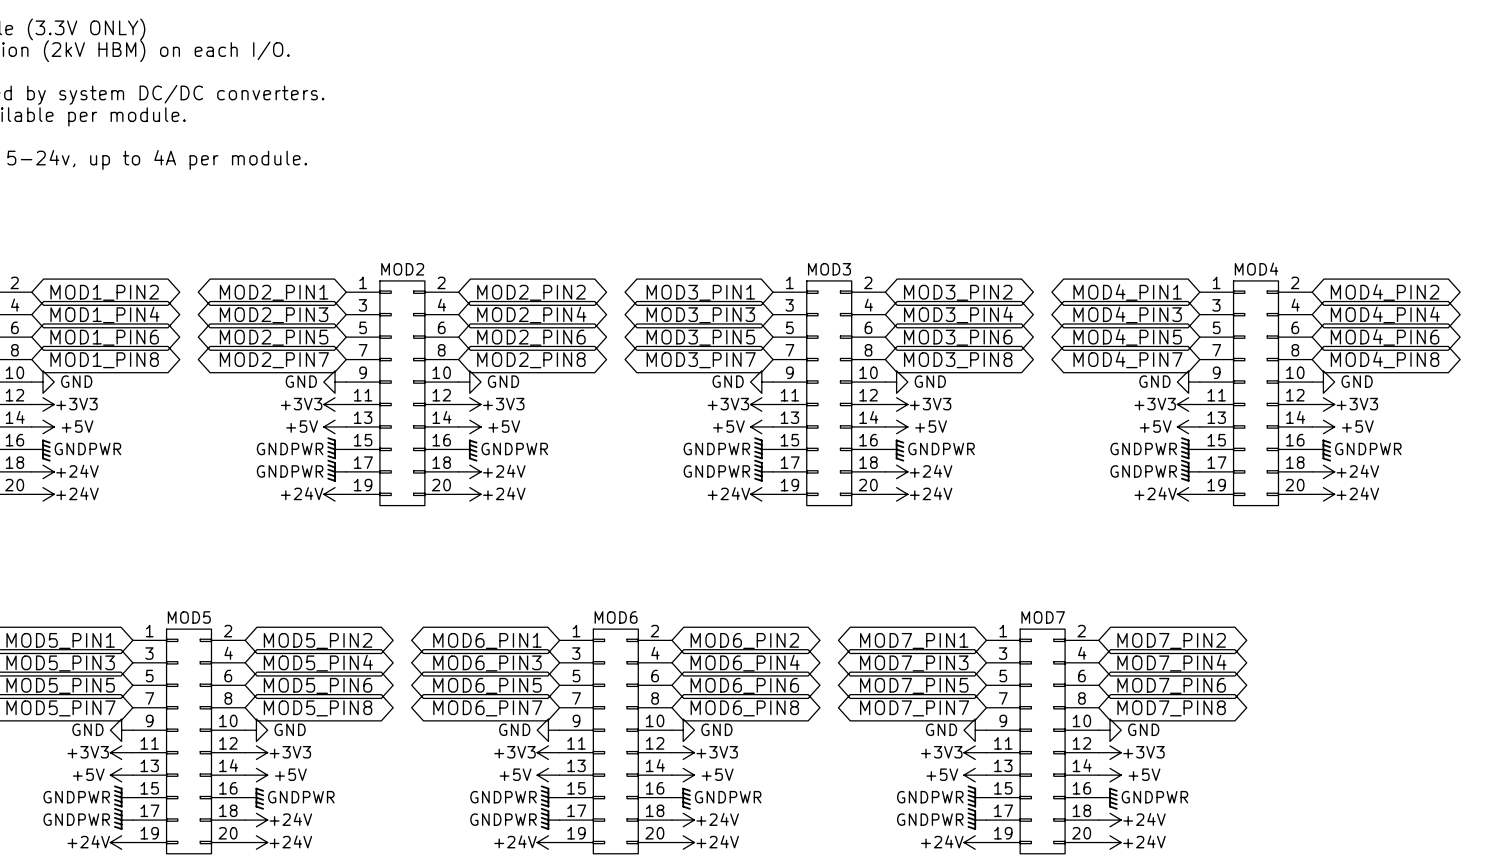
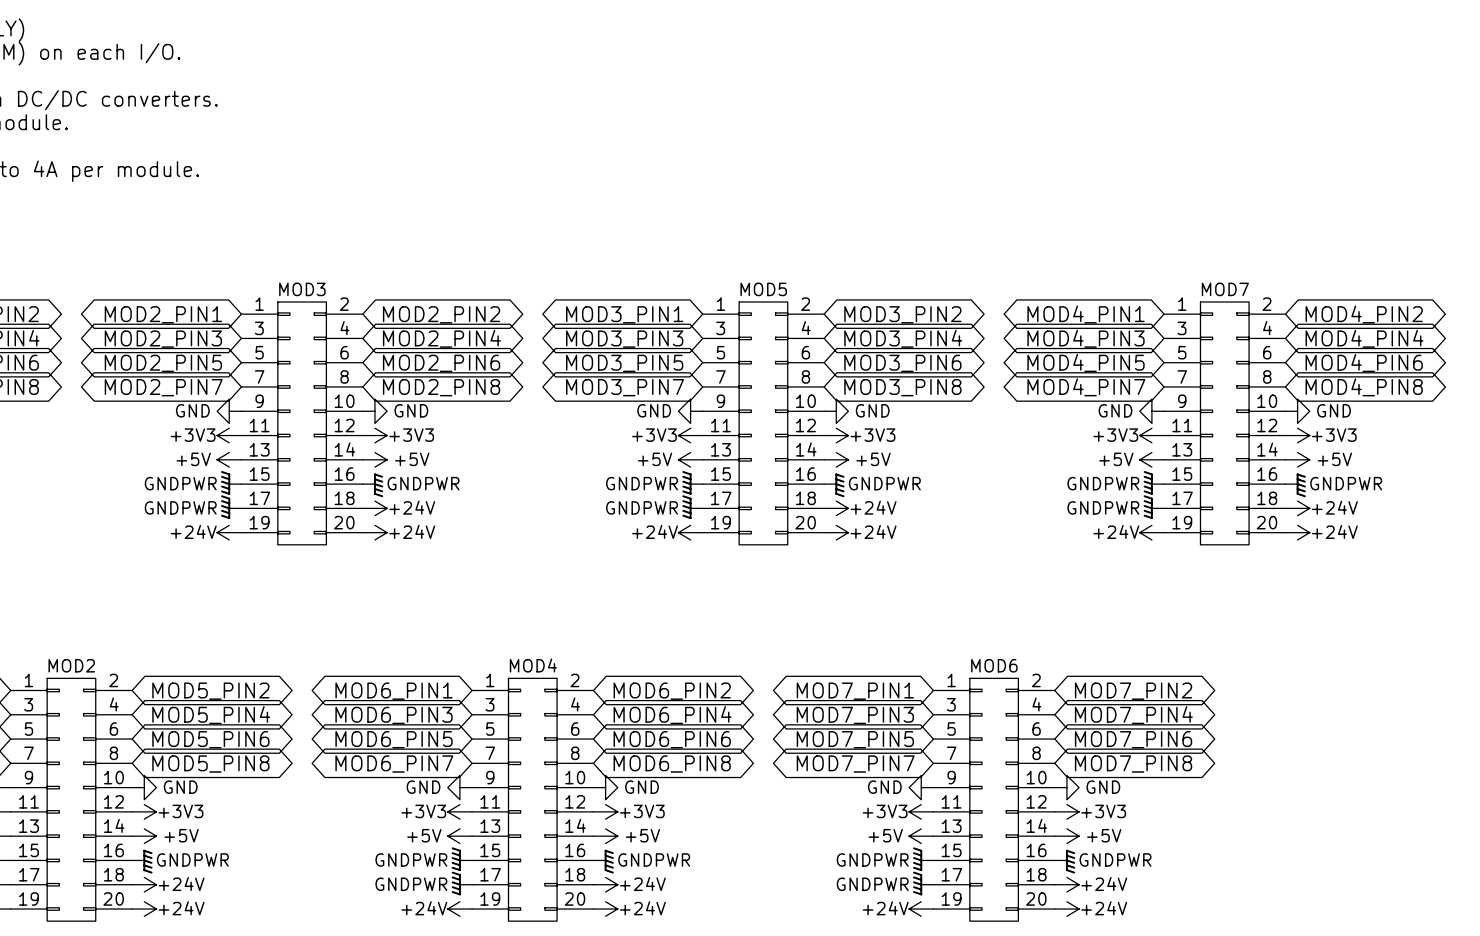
MOD2 name: MOD2 (402, 269) -> MOD3 (302, 289)
MOD3 name: MOD3 (829, 269) -> MOD5 (763, 289)
MOD4 name: MOD4 (1256, 269) -> MOD7 (1225, 289)
MOD5 name: MOD5 (189, 617) -> MOD2 (71, 665)
MOD6 name: MOD6 (616, 617) -> MOD4 (533, 665)
MOD7 name: MOD7 (1043, 617) -> MOD6 (994, 665)

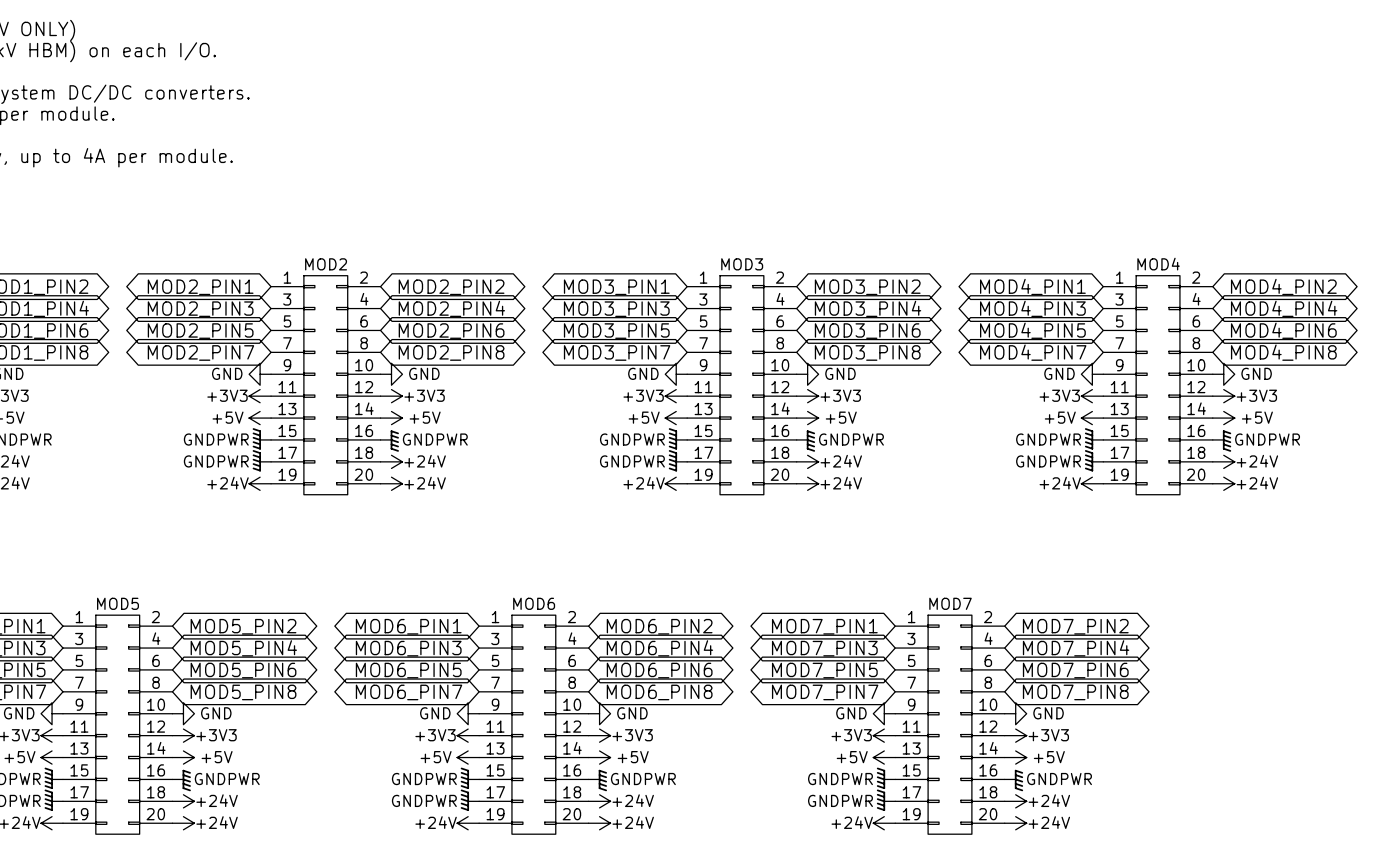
MOD3 name: MOD3 (302, 289) -> MOD2 (326, 264)
MOD5 name: MOD5 (763, 289) -> MOD3 (742, 264)
MOD7 name: MOD7 (1225, 289) -> MOD4 (1158, 264)
MOD2 name: MOD2 (71, 665) -> MOD5 (118, 603)
MOD4 name: MOD4 (533, 665) -> MOD6 (534, 603)
MOD6 name: MOD6 (994, 665) -> MOD7 (950, 603)

